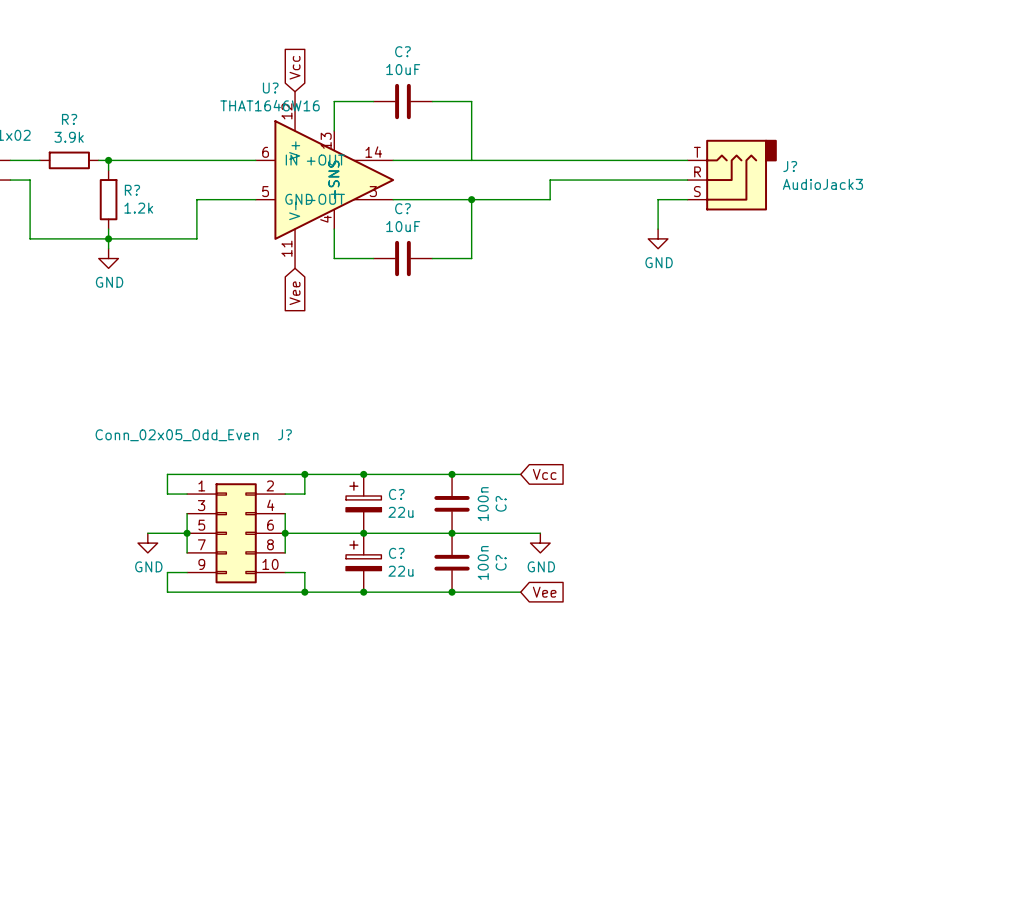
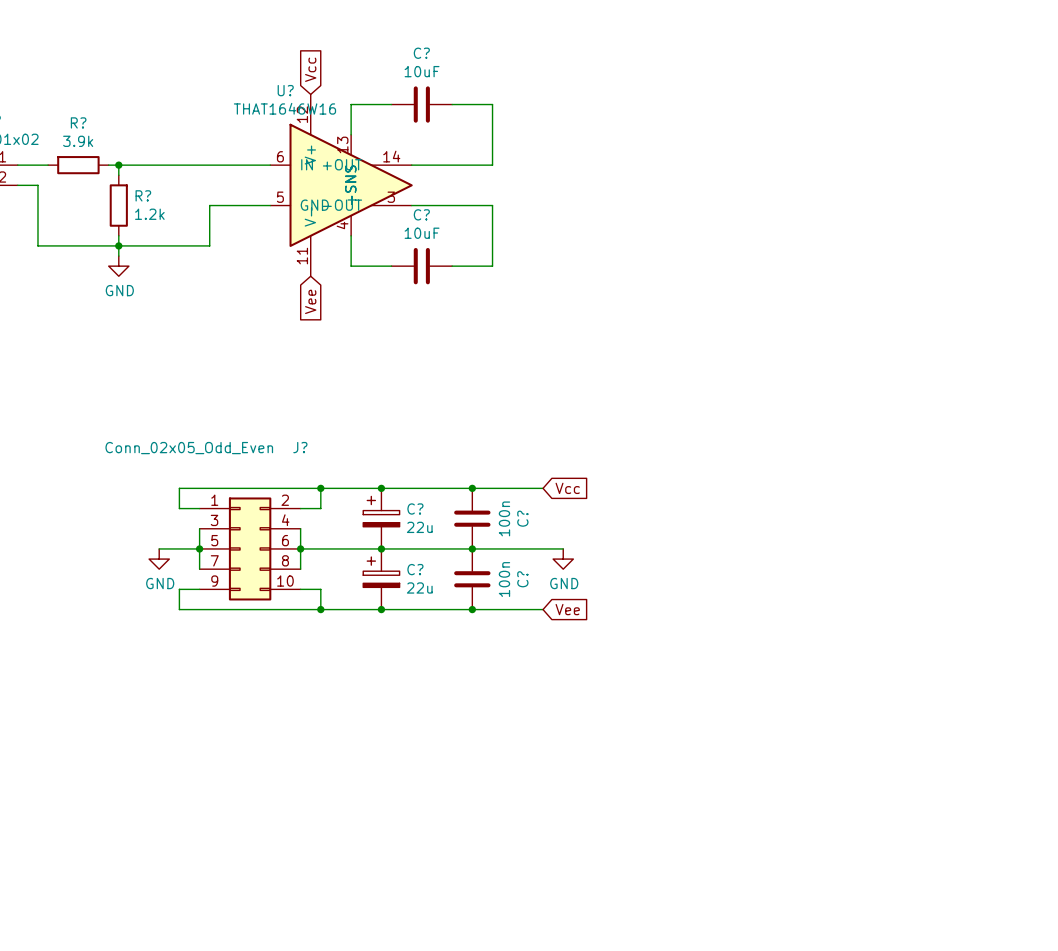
wire: (471, 160) (687, 160) -> none
J?: AudioJack3 (732, 175) -> none
wire: (687, 180) (550, 180) (550, 199) (471, 199) -> none
junction: (471, 199) -> none
wire: (687, 199) (658, 199) (658, 229) -> none
power symbol: GND (658, 238) -> none

